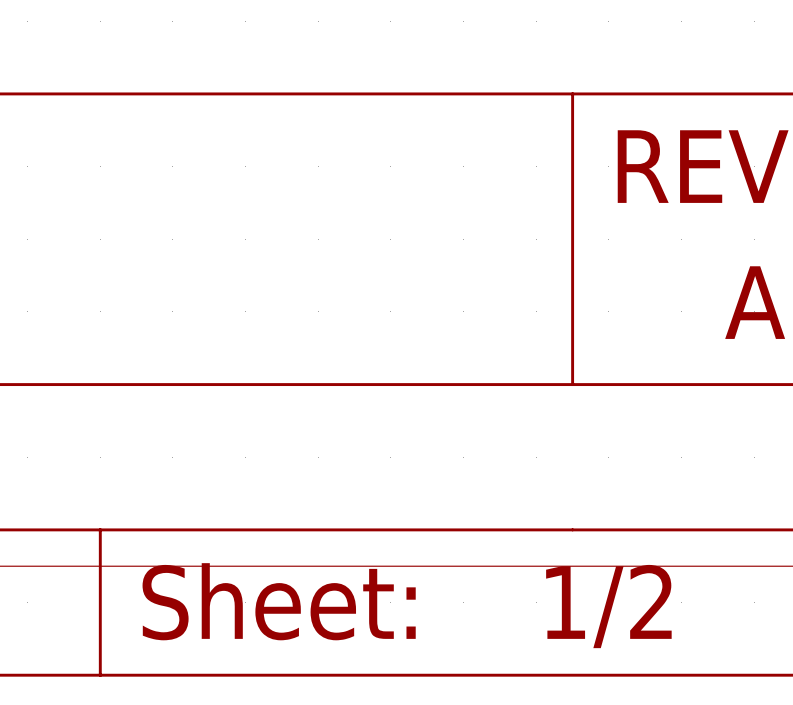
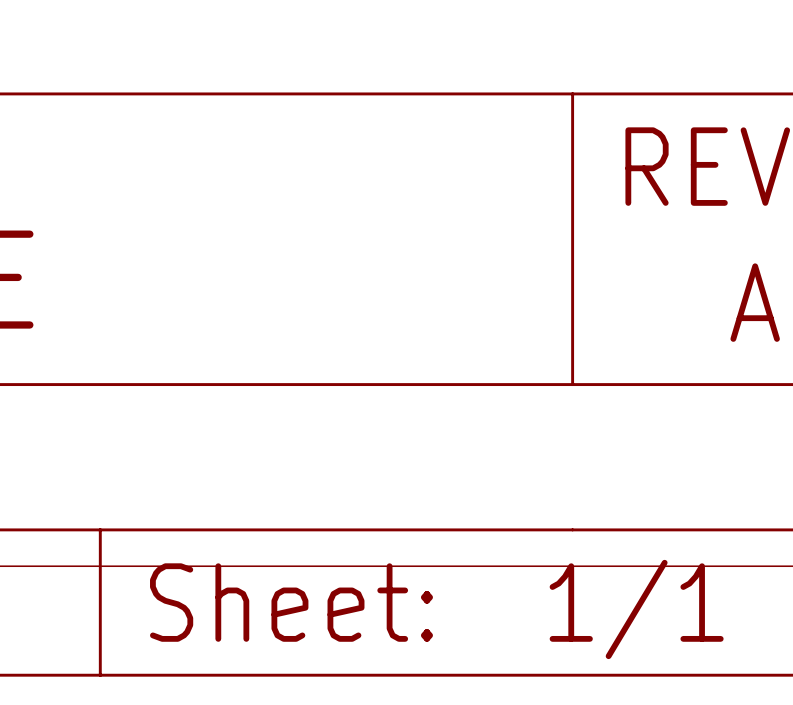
part text: 1/2 (608, 606) -> 1/1 (636, 609)

